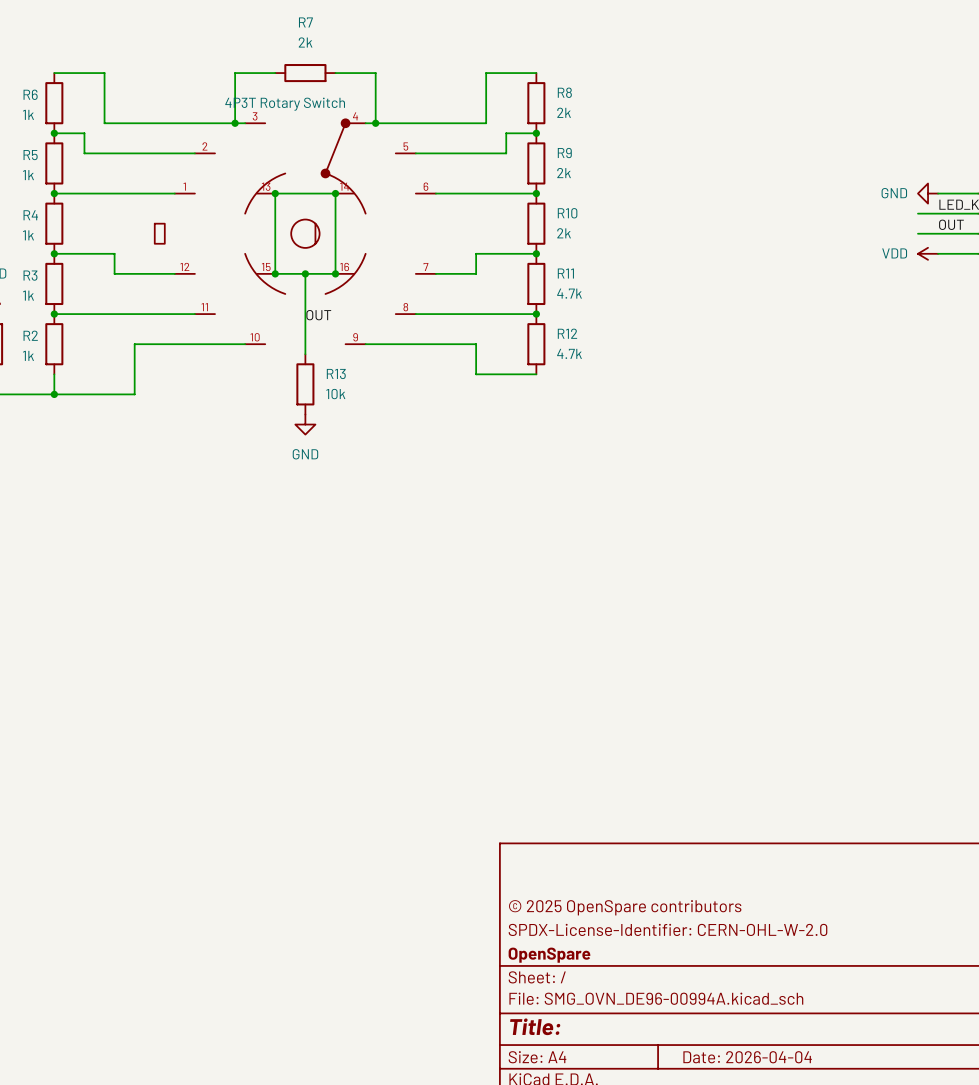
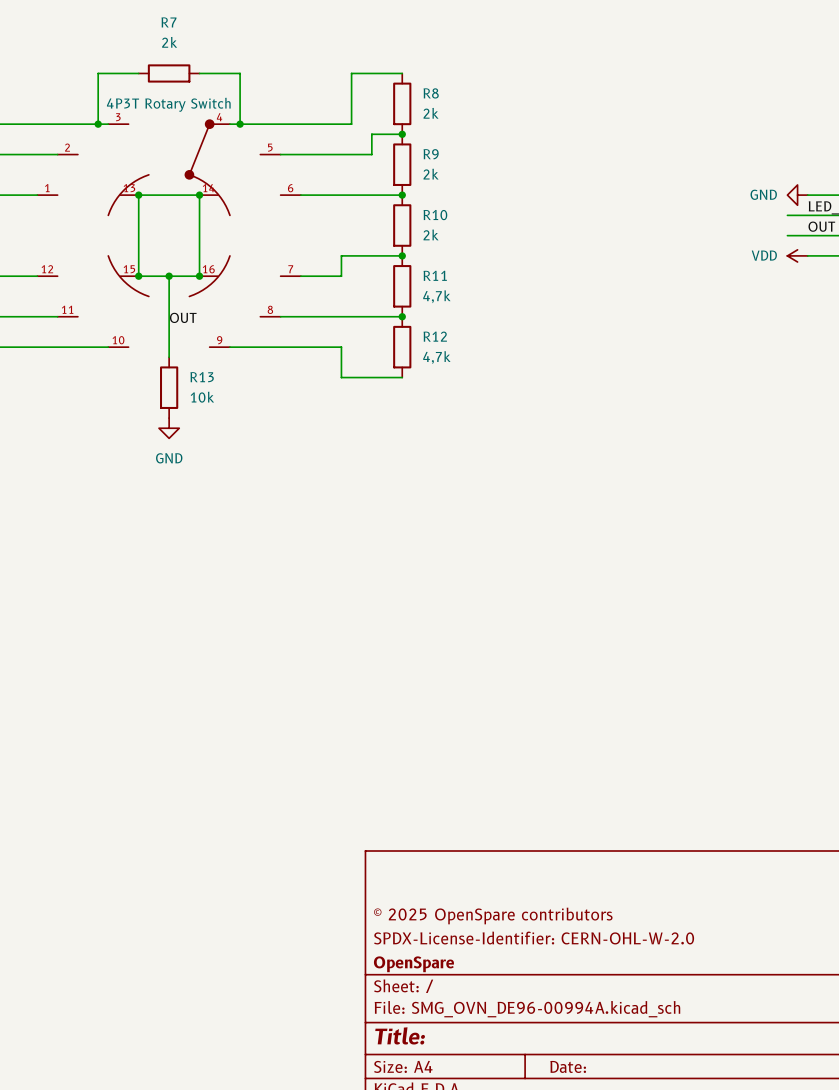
part: 4P3T Rotary Switch (295, 231) -> none
part: none -> 4P3T Rotary Switch (169, 233)
R11 value: 4.7k (569, 293) -> 4,7k (436, 296)
R12 value: 4.7k (569, 353) -> 4,7k (436, 357)
title block: Date: 2026-04-04 (747, 1057) -> Date: (568, 1066)

